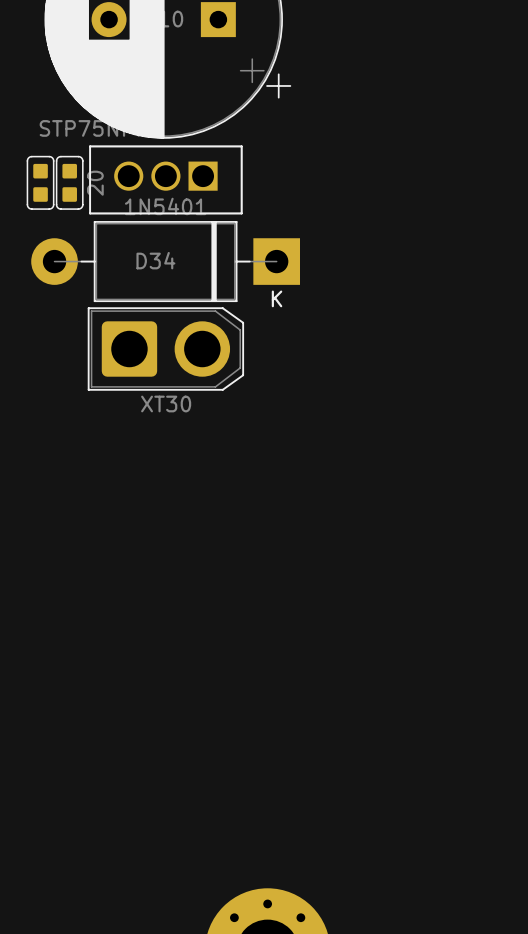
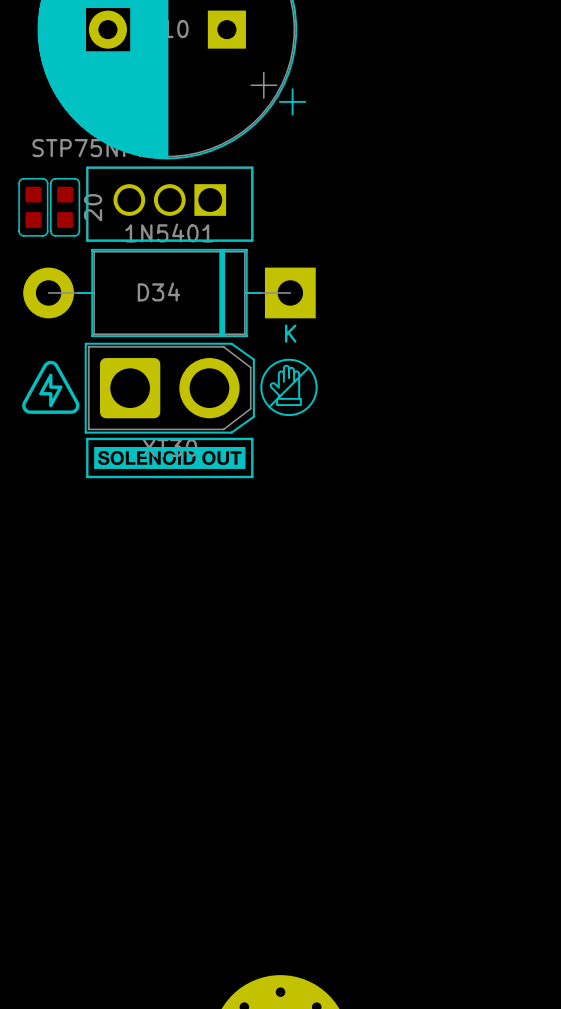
drawing: none -> [260, 358, 318, 417]
drawing: none -> [22, 360, 80, 414]
line: none -> (87, 438) (252, 438) (252, 477) (87, 477) (87, 438)
drawing: none -> [94, 446, 246, 469]

